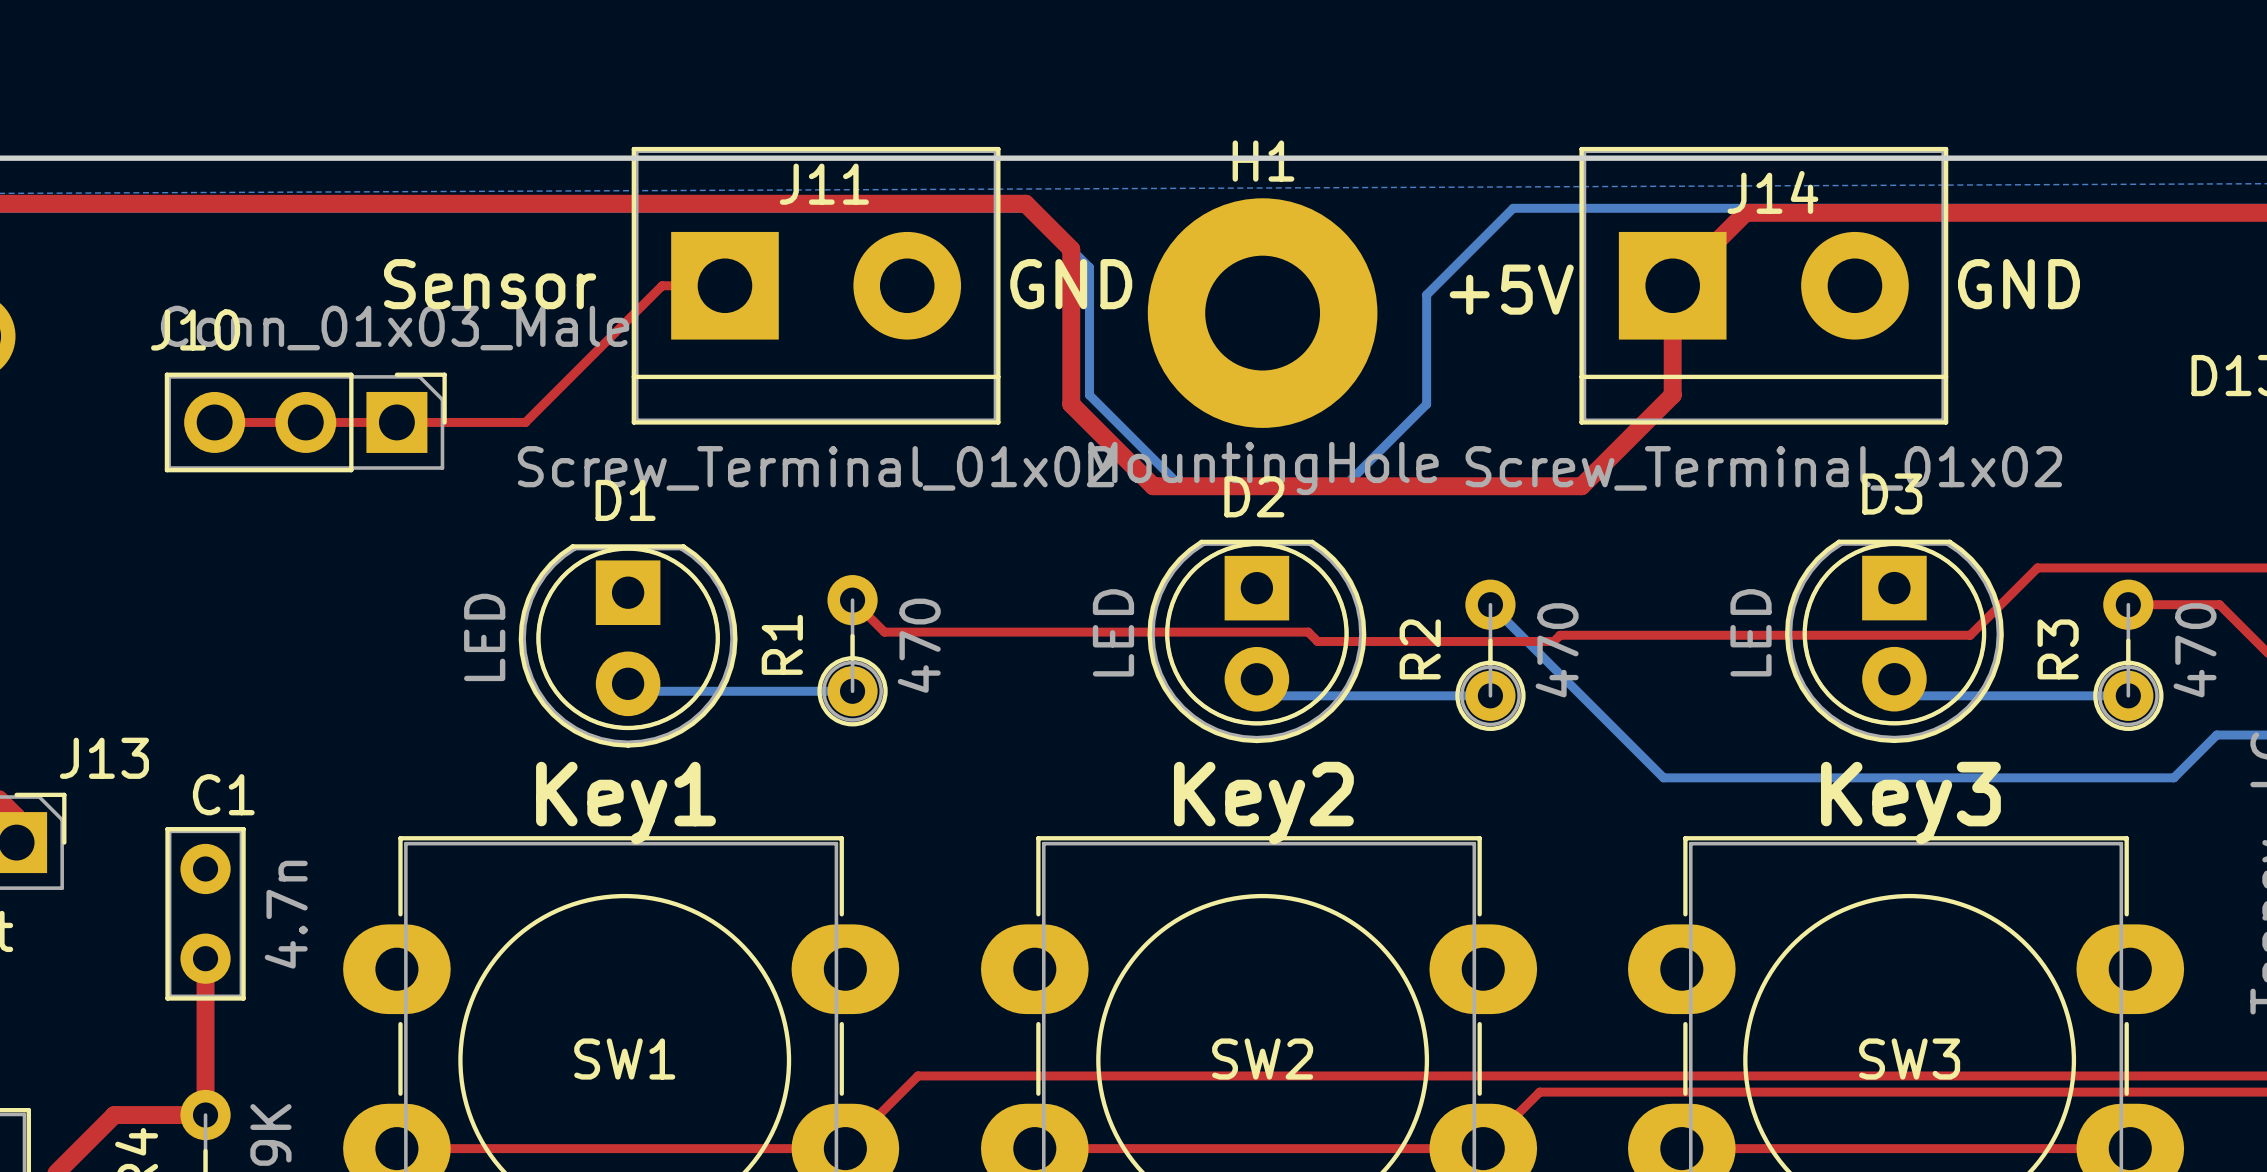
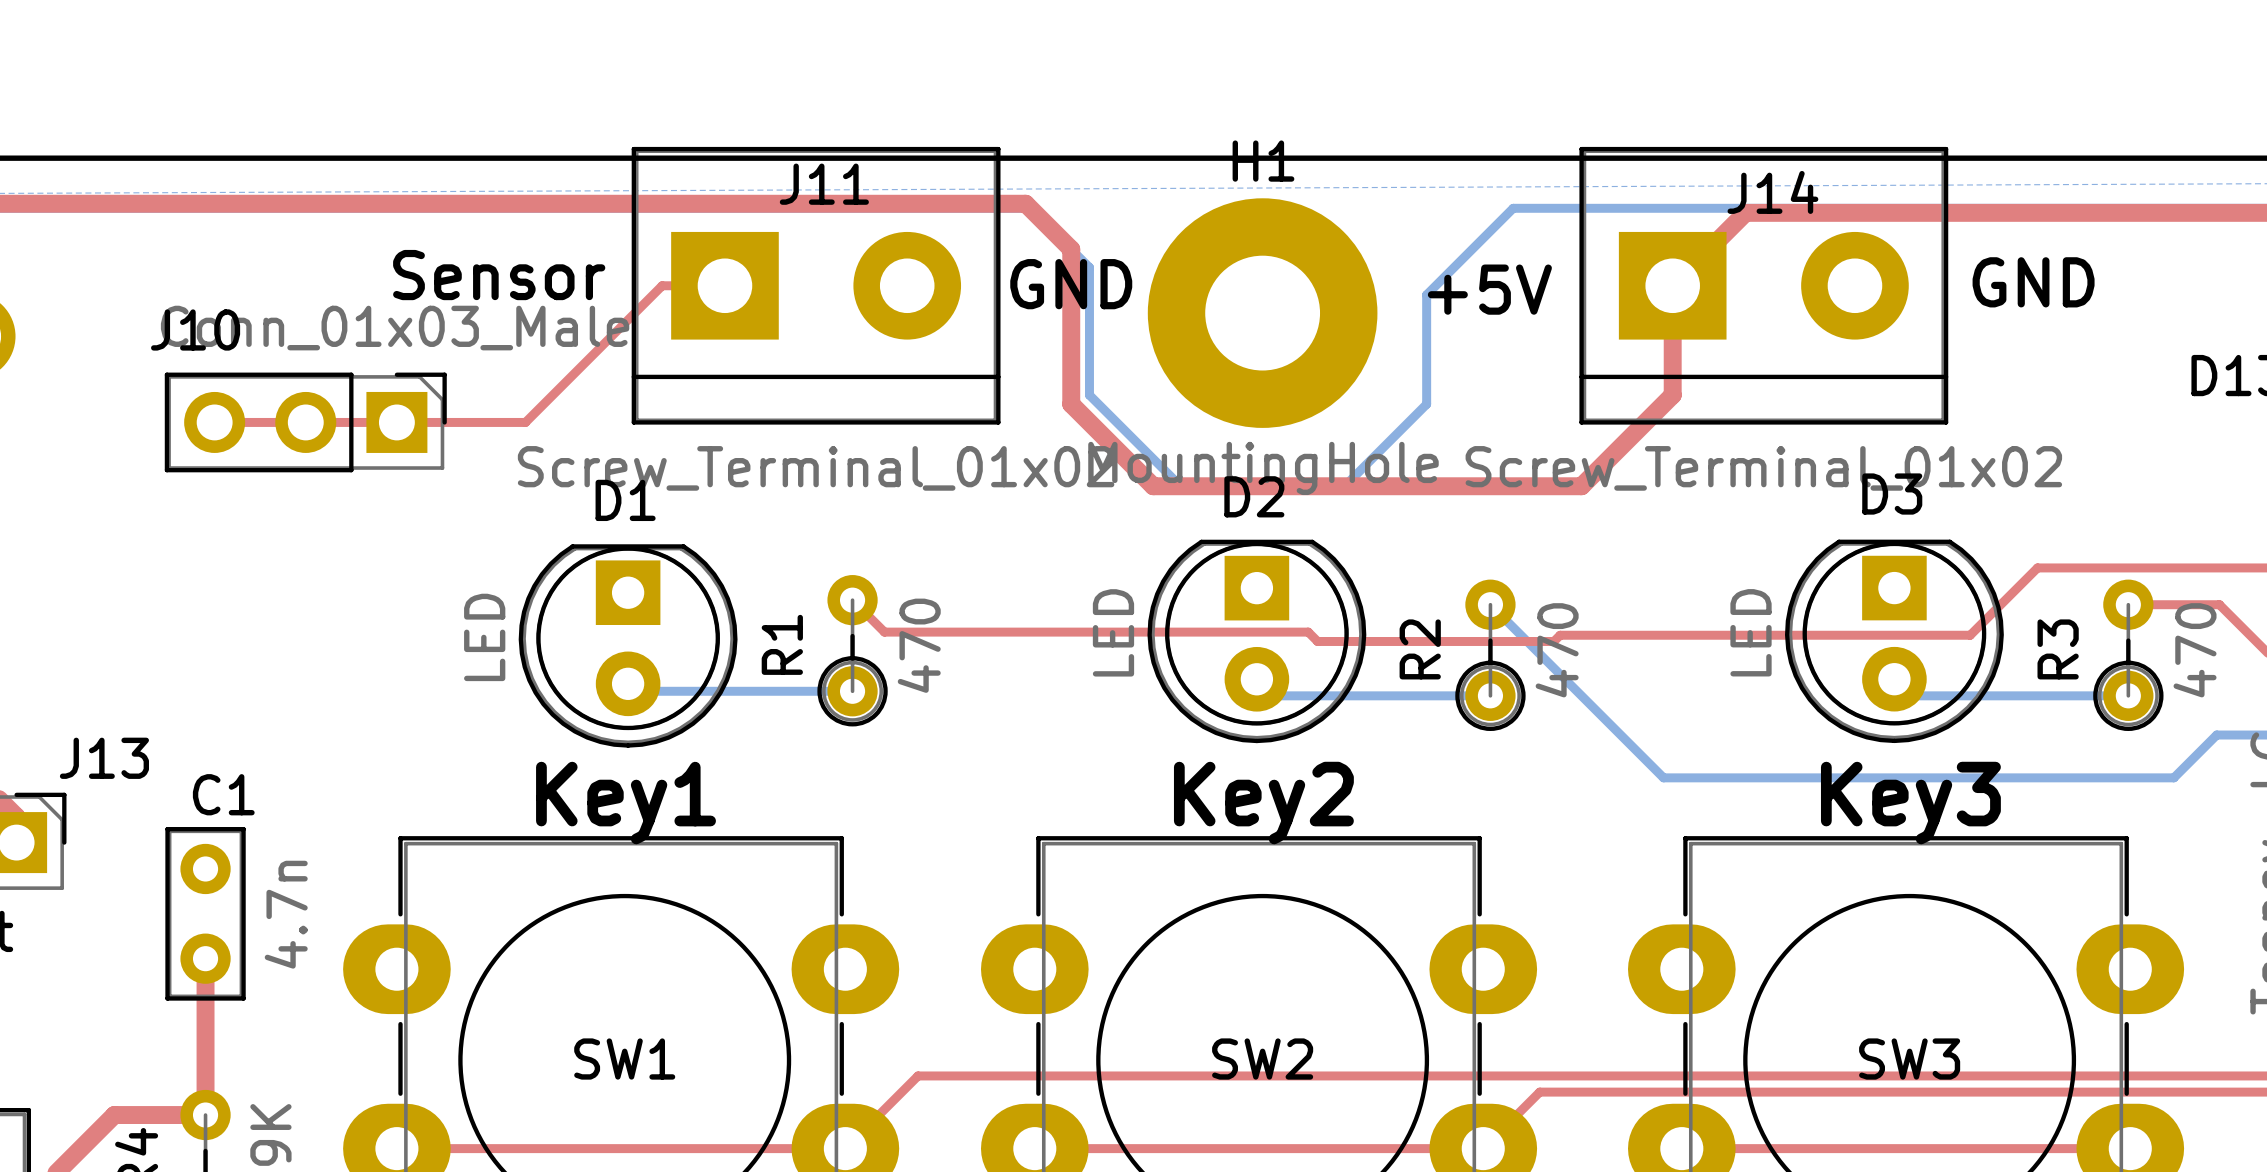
text position: Sensor (490, 284) -> Sensor (499, 275)
text position: GND (2018, 284) -> GND (2033, 282)
text position: +5V (1511, 289) -> +5V (1489, 289)

